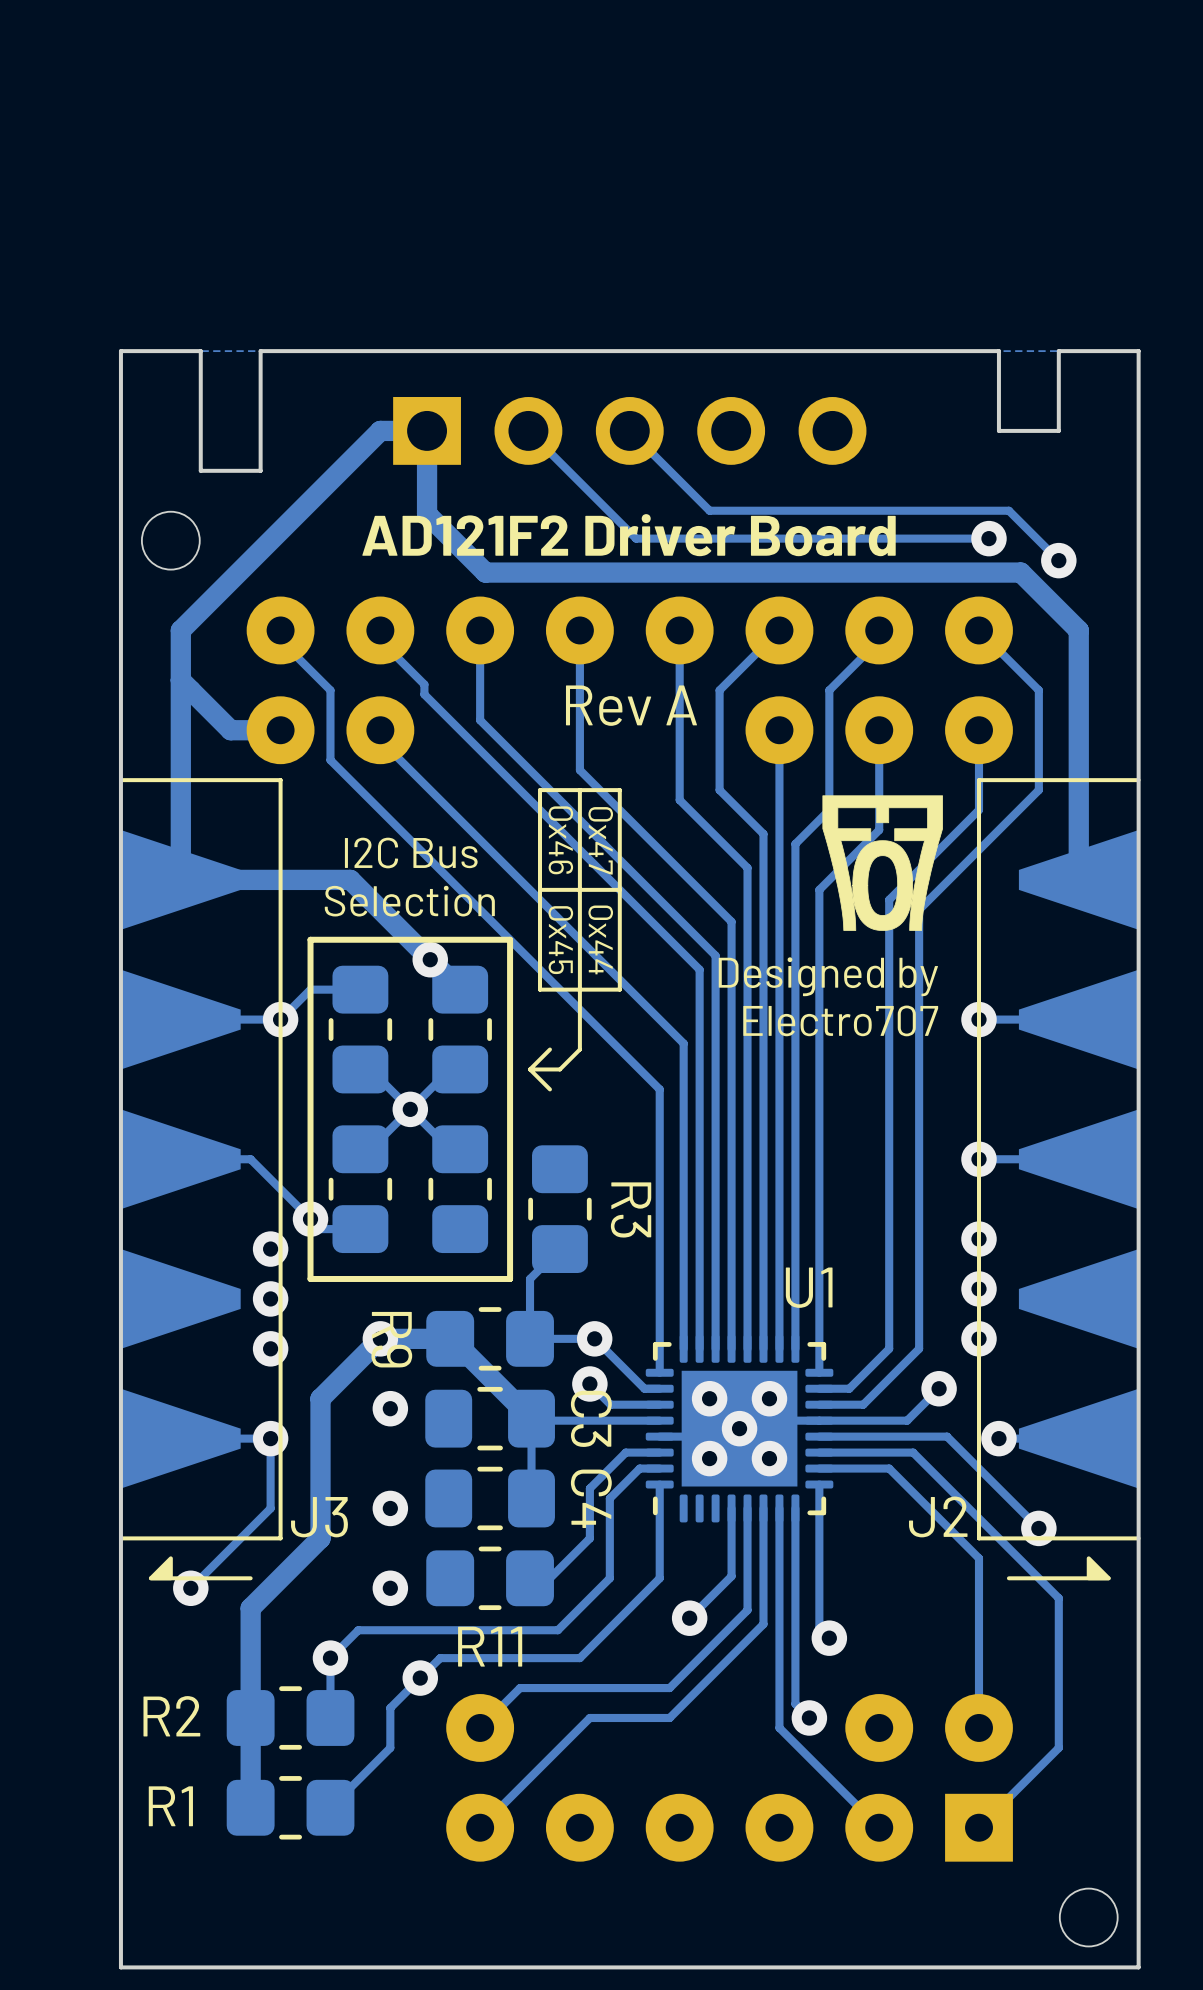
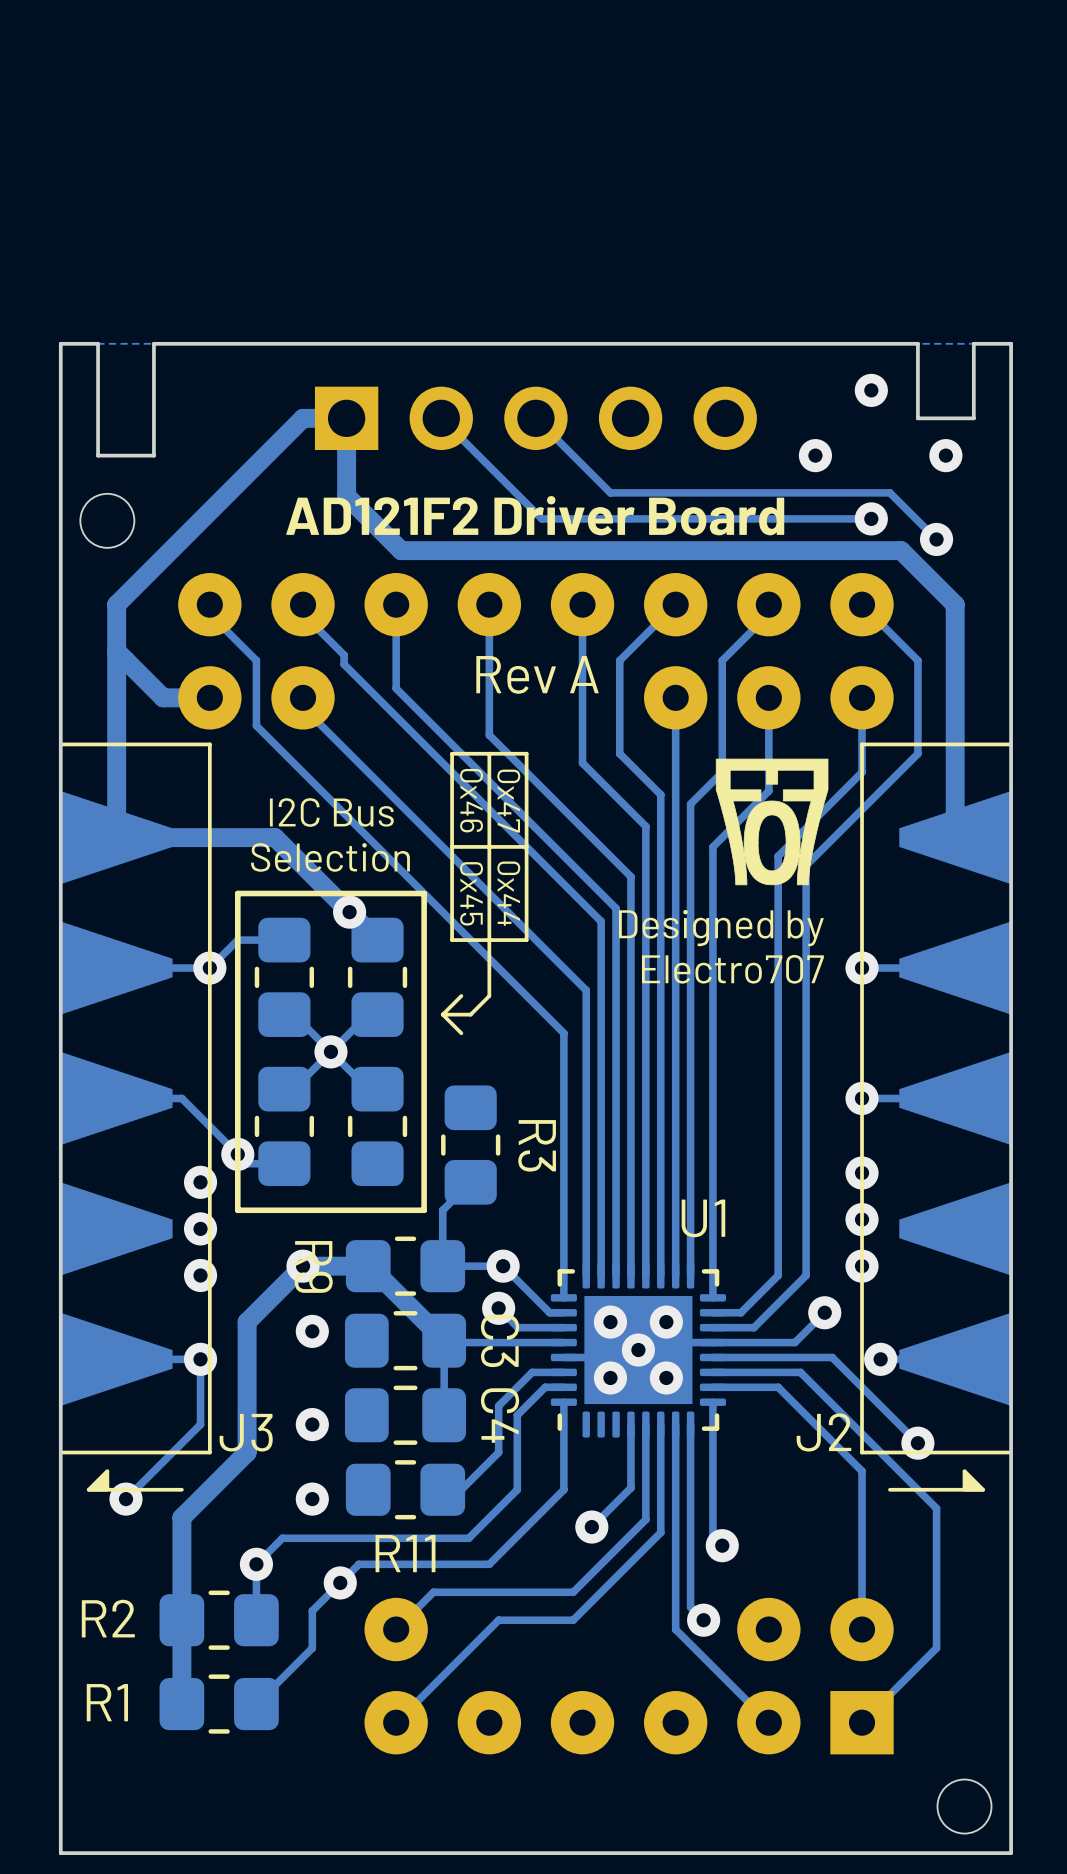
board edge: (160, 351) (200, 351) (200, 470) -> (98, 343) (98, 455) (135, 455)
board edge: (260, 351) (260, 470) (220, 470) -> (191, 343) (153, 343) (153, 455)
board edge: (998, 351) (998, 430) (1038, 430) -> (880, 343) (917, 343) (917, 418)
board edge: (1098, 351) (1058, 351) (1058, 430) -> (973, 343) (973, 418) (936, 418)
via: none -> (871, 390)
via: none -> (815, 455)
via: none -> (945, 455)

